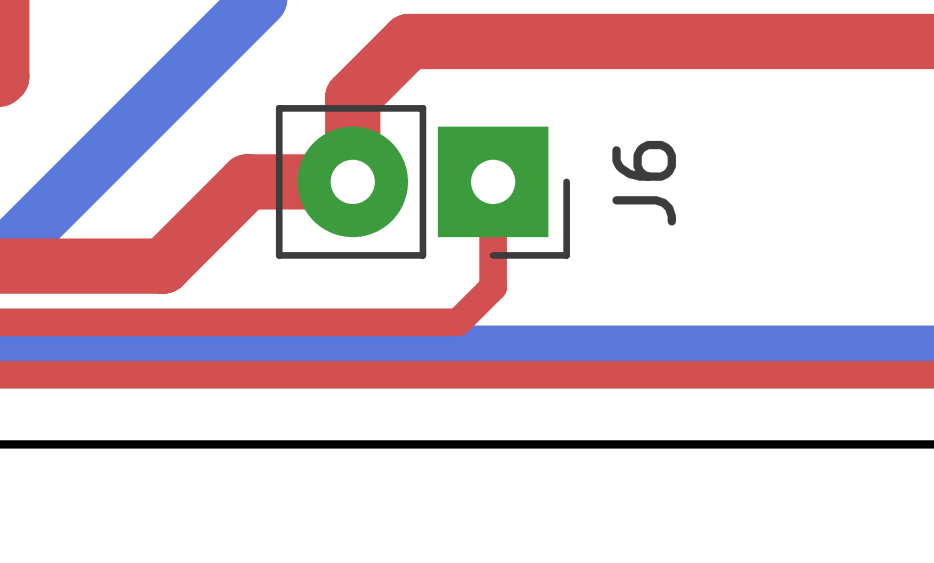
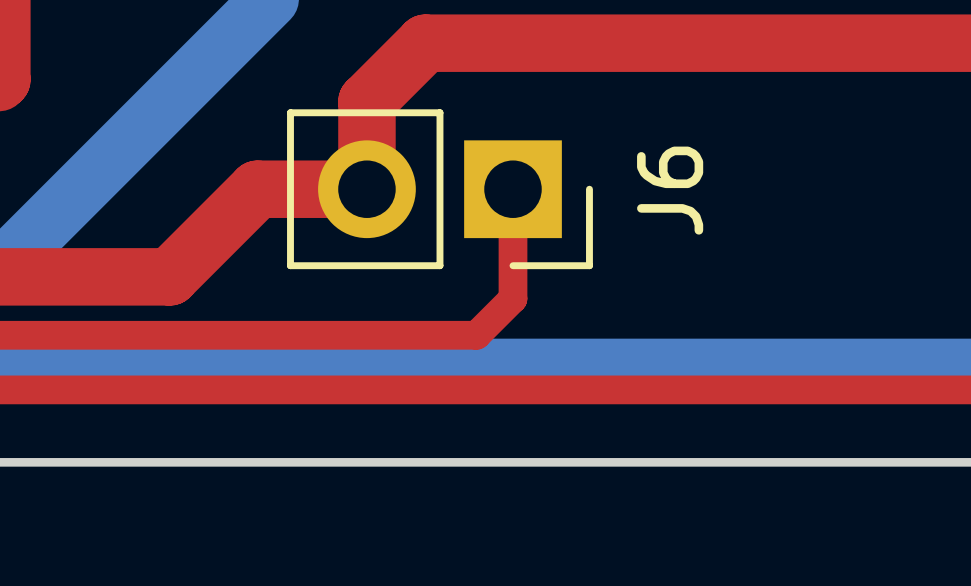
J6 footprint: [275, 105, 570, 259] -> [287, 109, 593, 270]

